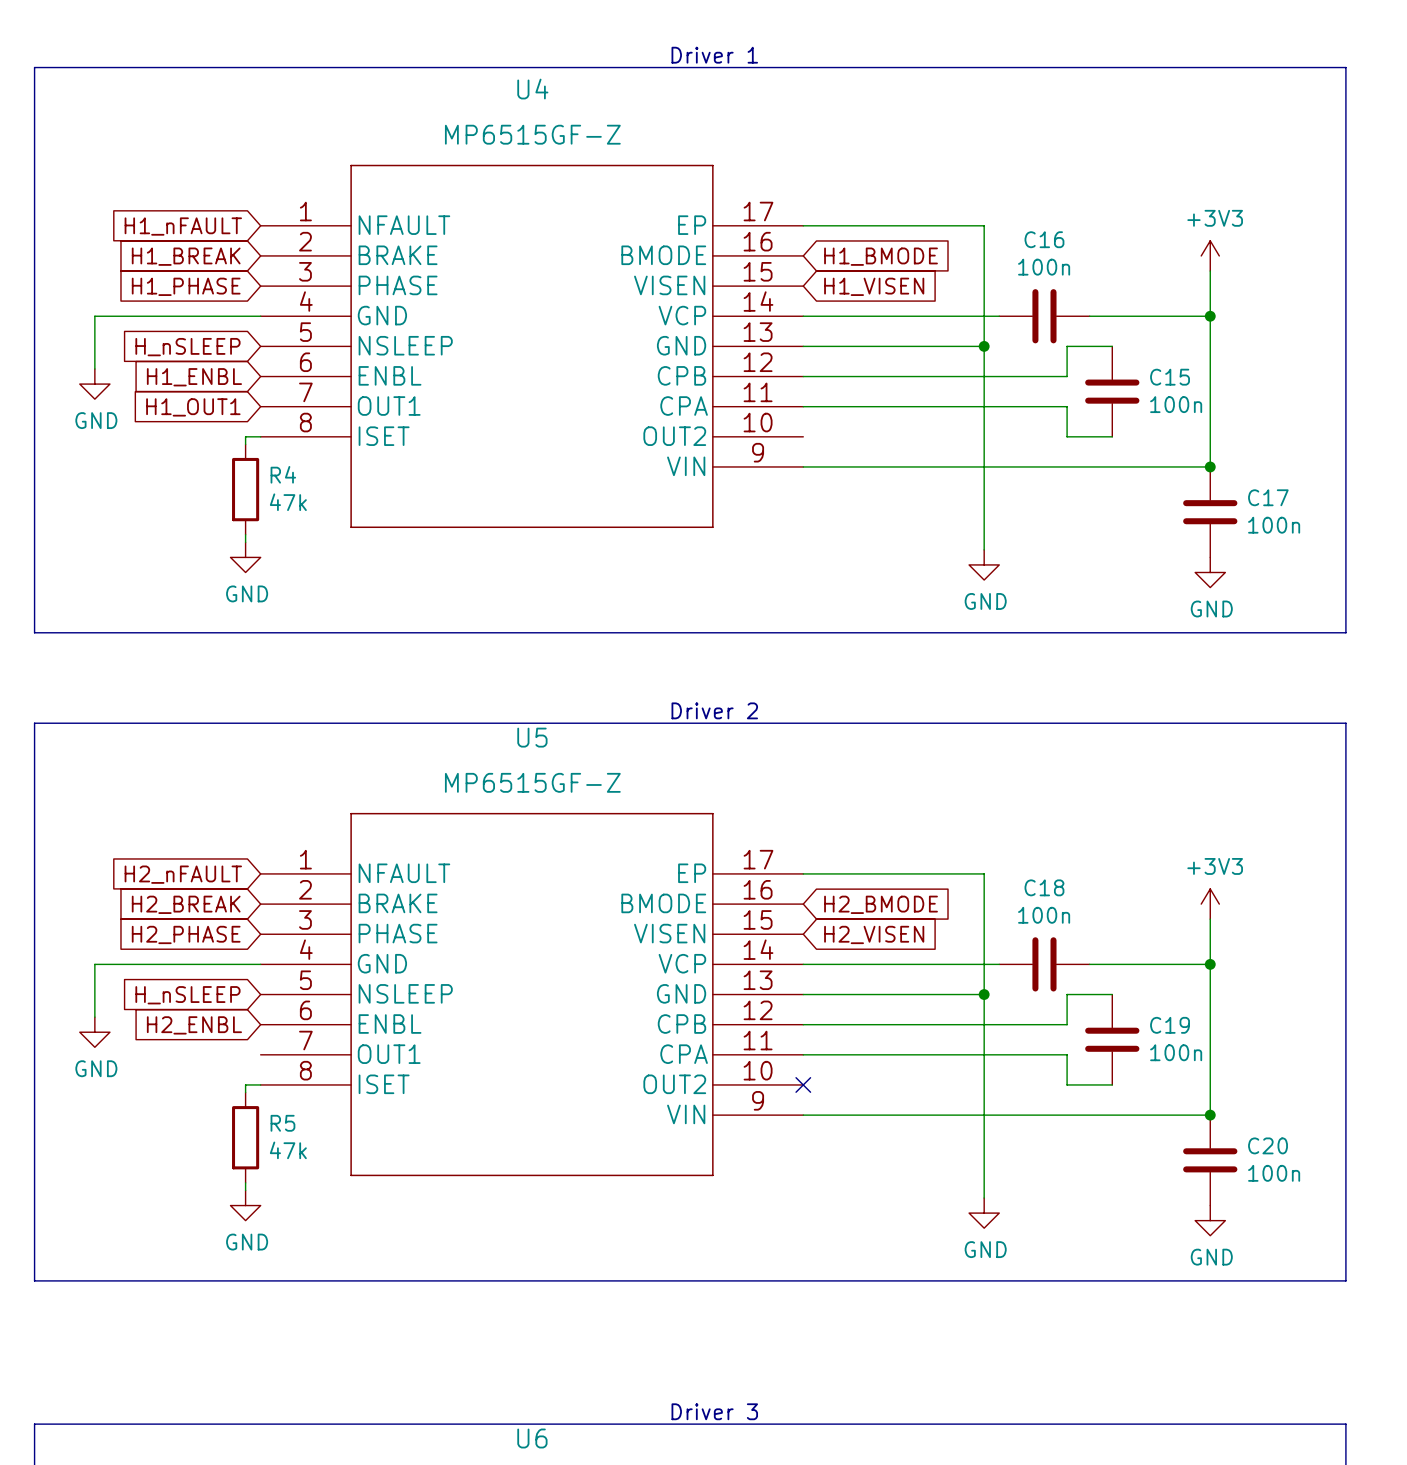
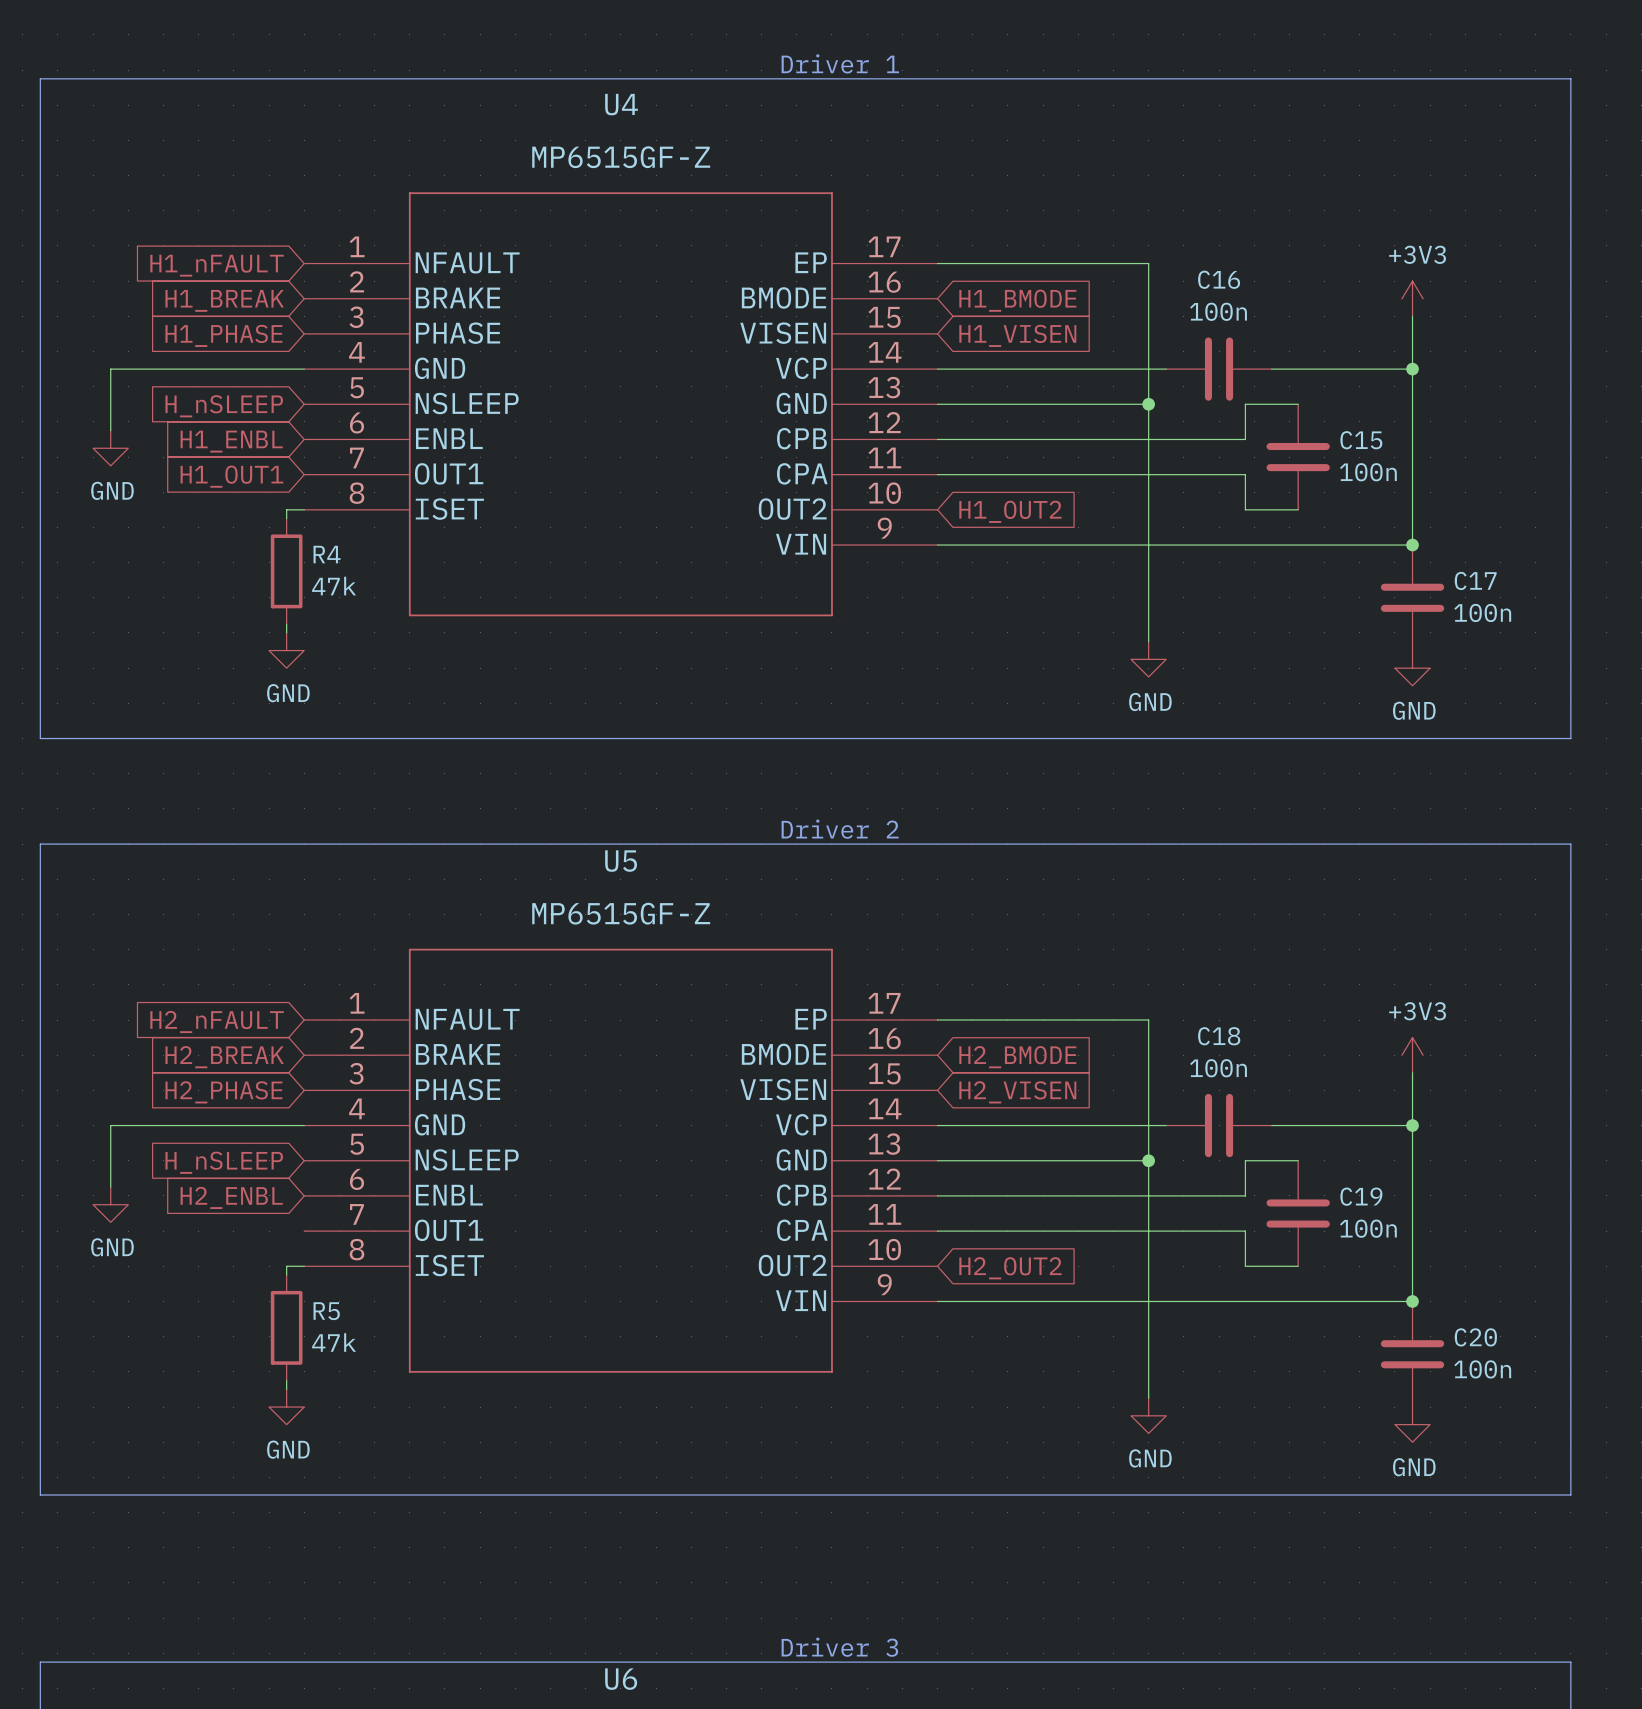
global label: none -> H1_OUT2 (1010, 511)
no-connect mark: (803, 1084) -> none
global label: none -> H2_OUT2 (1010, 1268)

